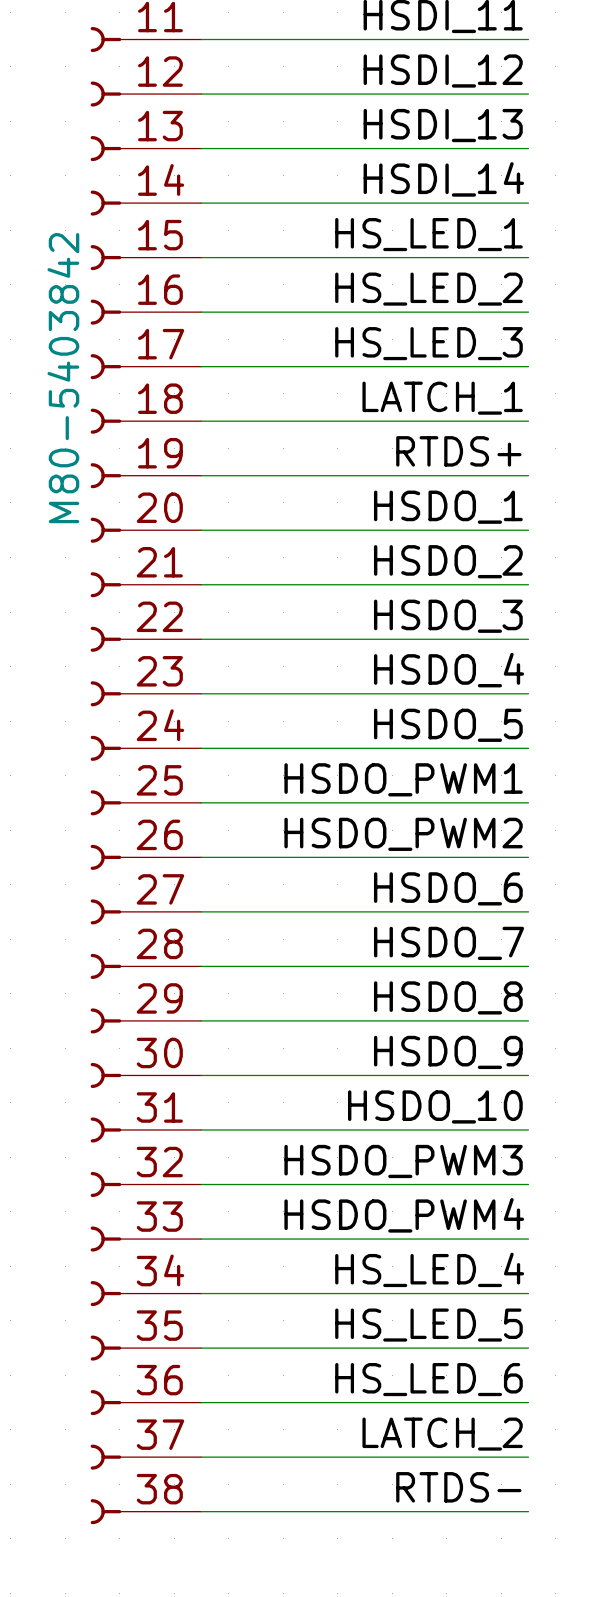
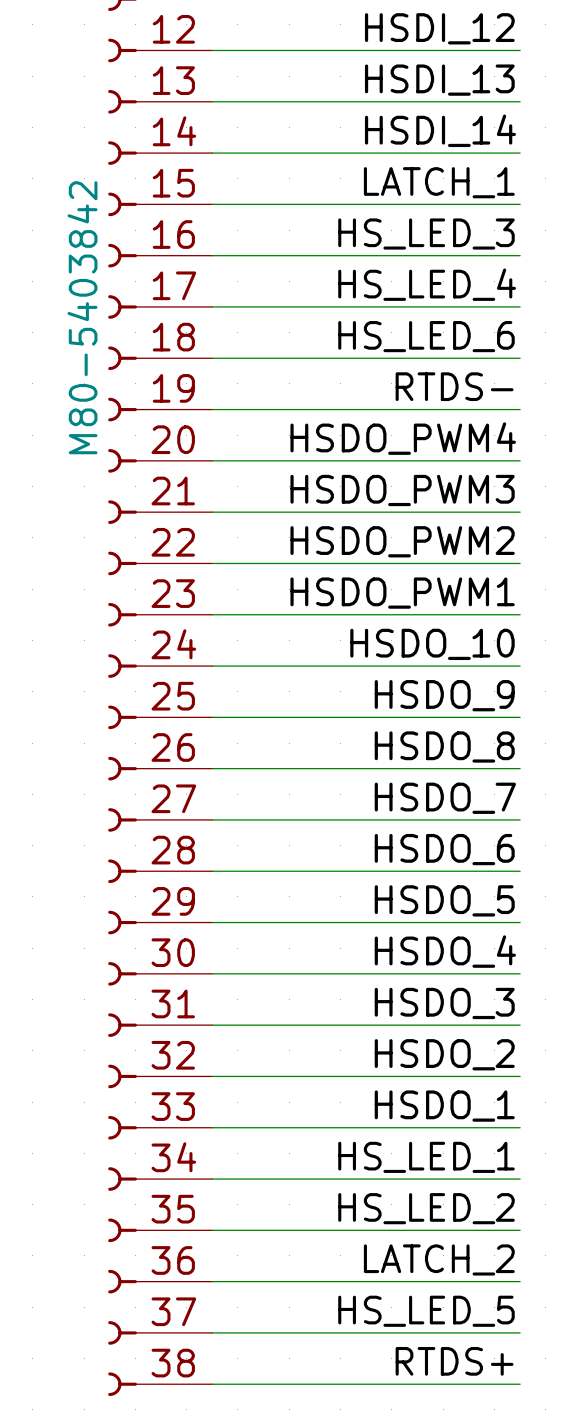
label: HS_LED_1 (428, 234) -> LATCH_1 (439, 182)
label: HS_LED_2 (428, 289) -> HS_LED_3 (426, 234)
label: HS_LED_3 (428, 343) -> HS_LED_4 (427, 284)
label: LATCH_1 (442, 398) -> HS_LED_6 (426, 336)
label: RTDS+ (458, 451) -> RTDS- (454, 386)
label: HSDO_1 (448, 507) -> HSDO_PWM4 (403, 438)
label: HSDO_2 (448, 561) -> HSDO_PWM3 (402, 490)
label: HSDO_3 (448, 616) -> HSDO_PWM2 (402, 541)
label: HSDO_4 (449, 670) -> HSDO_PWM1 (402, 593)
label: HSDO_5 (448, 725) -> HSDO_10 (432, 644)
label: HSDO_PWM1 (403, 779) -> HSDO_9 (444, 695)
label: HSDO_PWM2 (403, 834) -> HSDO_8 (444, 746)
label: HSDO_6 (448, 888) -> HSDO_7 (445, 798)
label: HSDO_7 (449, 943) -> HSDO_6 (444, 849)
label: HSDO_8 (448, 997) -> HSDO_5 (444, 900)
label: HSDO_9 (448, 1052) -> HSDO_4 (445, 951)
label: HSDO_10 (435, 1106) -> HSDO_3 (444, 1003)
label: HSDO_PWM3 (403, 1161) -> HSDO_2 (444, 1054)
label: HSDO_PWM4 (404, 1215) -> HSDO_1 (444, 1106)
label: HS_LED_4 (429, 1269) -> HS_LED_1 (426, 1157)
label: HS_LED_5 (428, 1325) -> HS_LED_2 (426, 1208)
label: HS_LED_6 (428, 1379) -> LATCH_2 (439, 1259)
label: LATCH_2 (442, 1434) -> HS_LED_5 (426, 1311)
label: RTDS- (458, 1487) -> RTDS+ (454, 1361)

